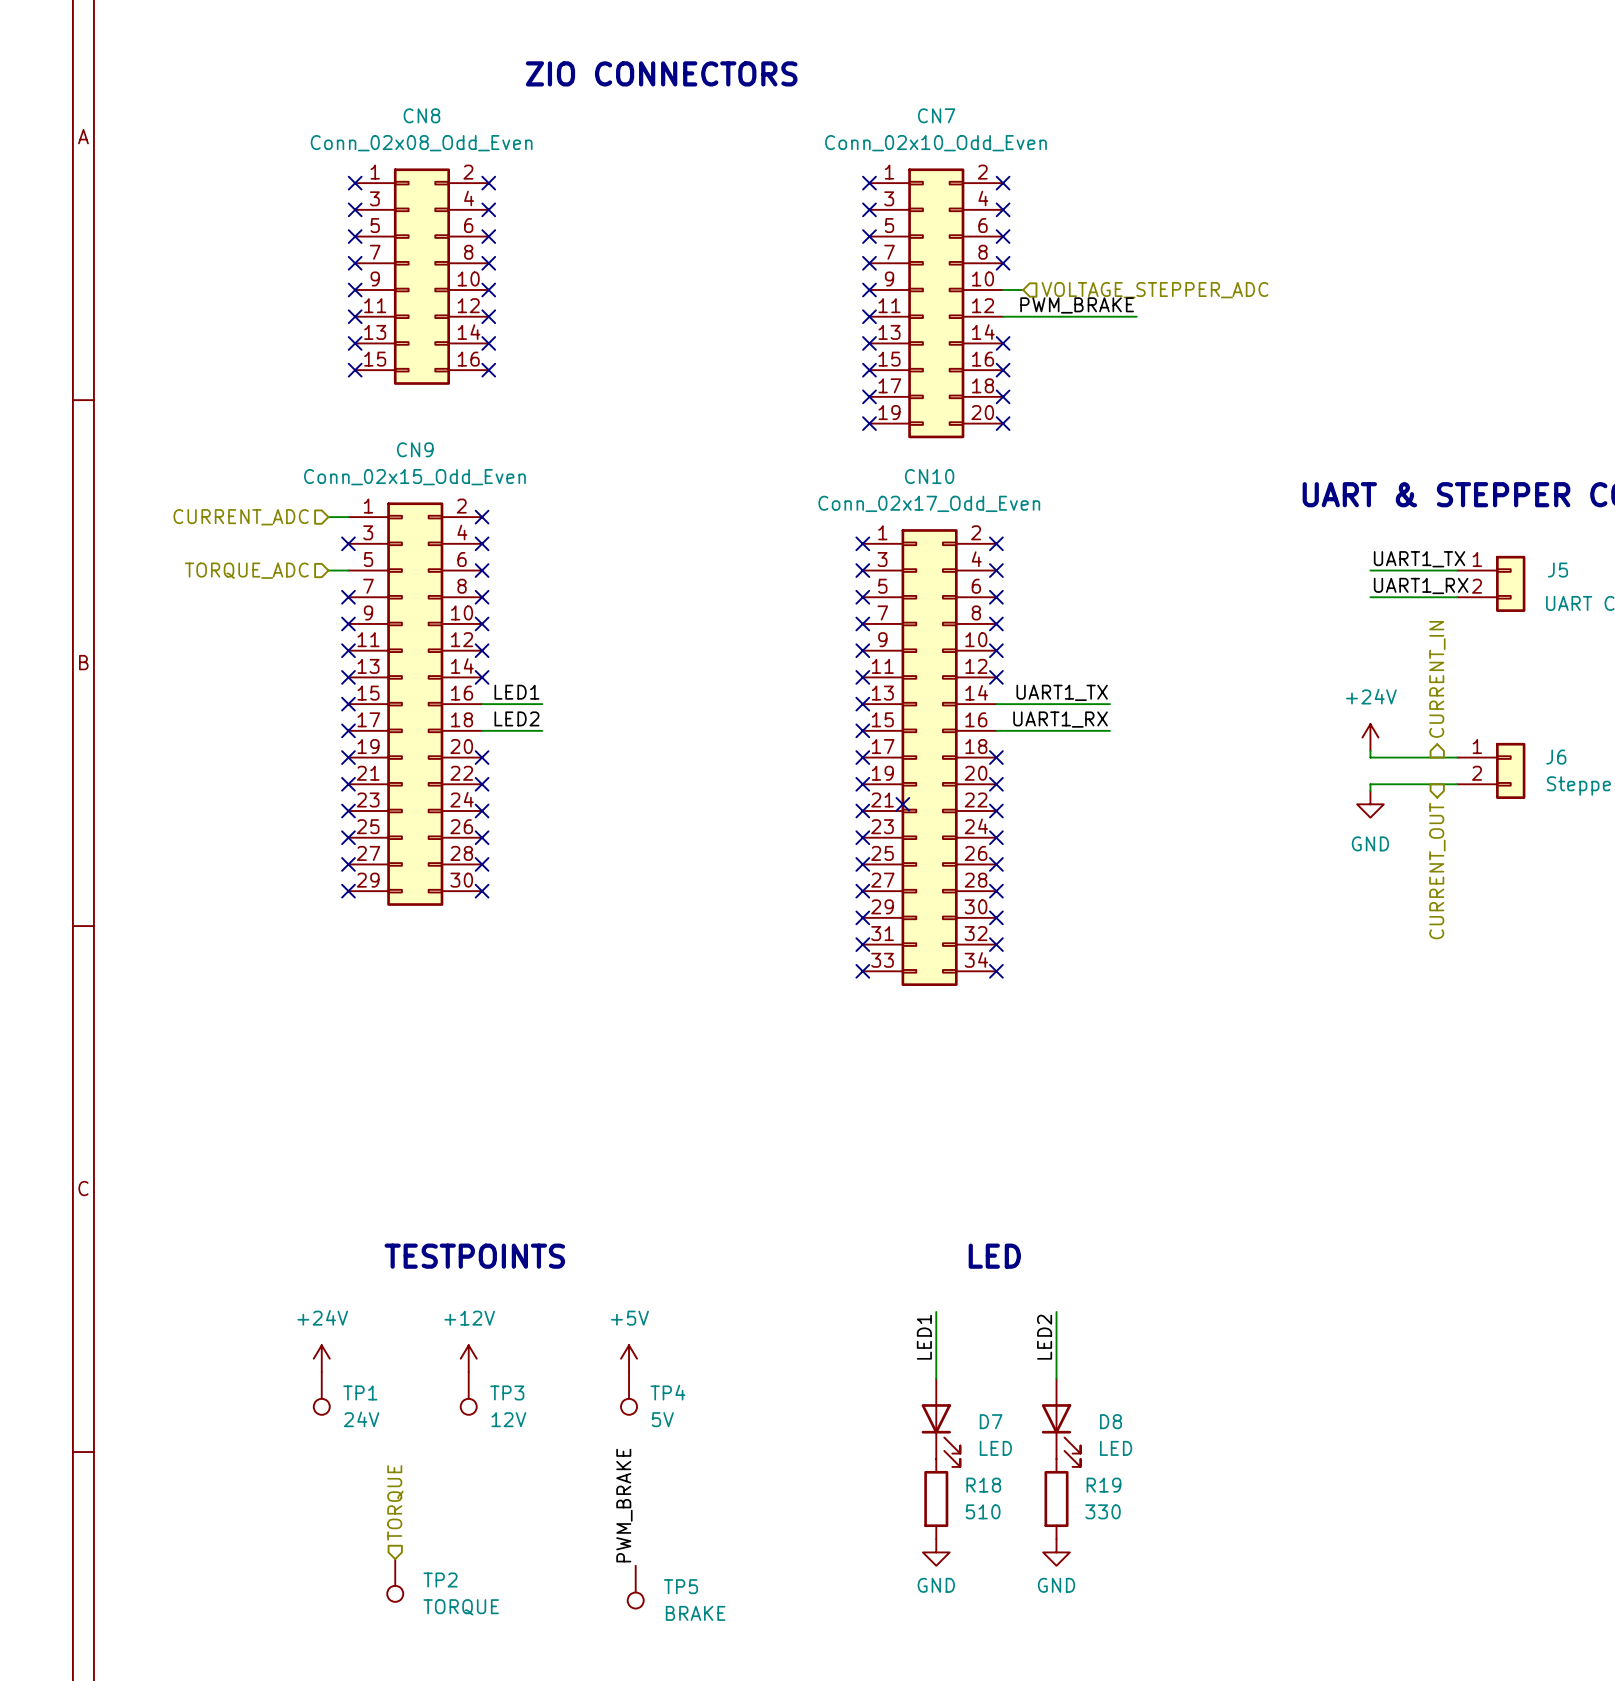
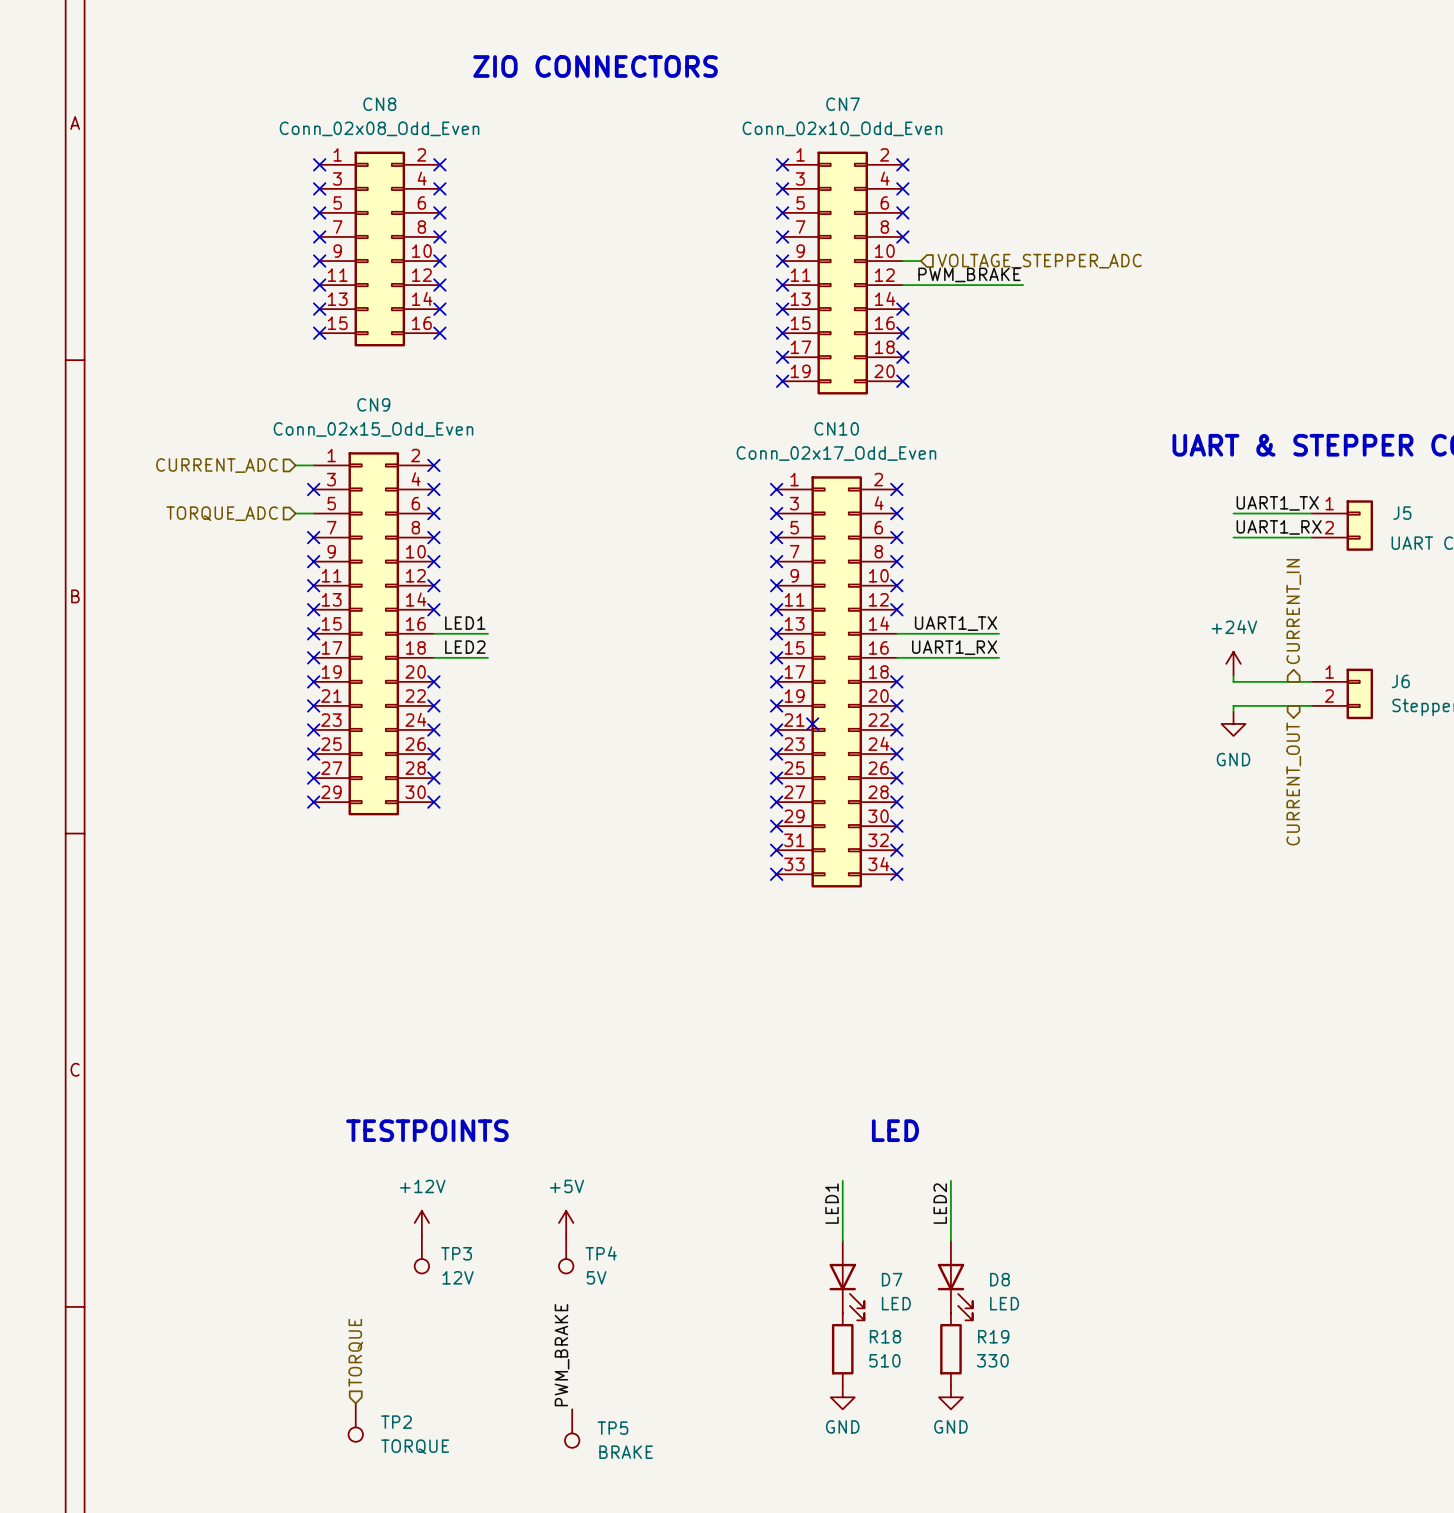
power symbol: +24V (321, 1358) -> none
TP1: 24V (321, 1393) -> none

